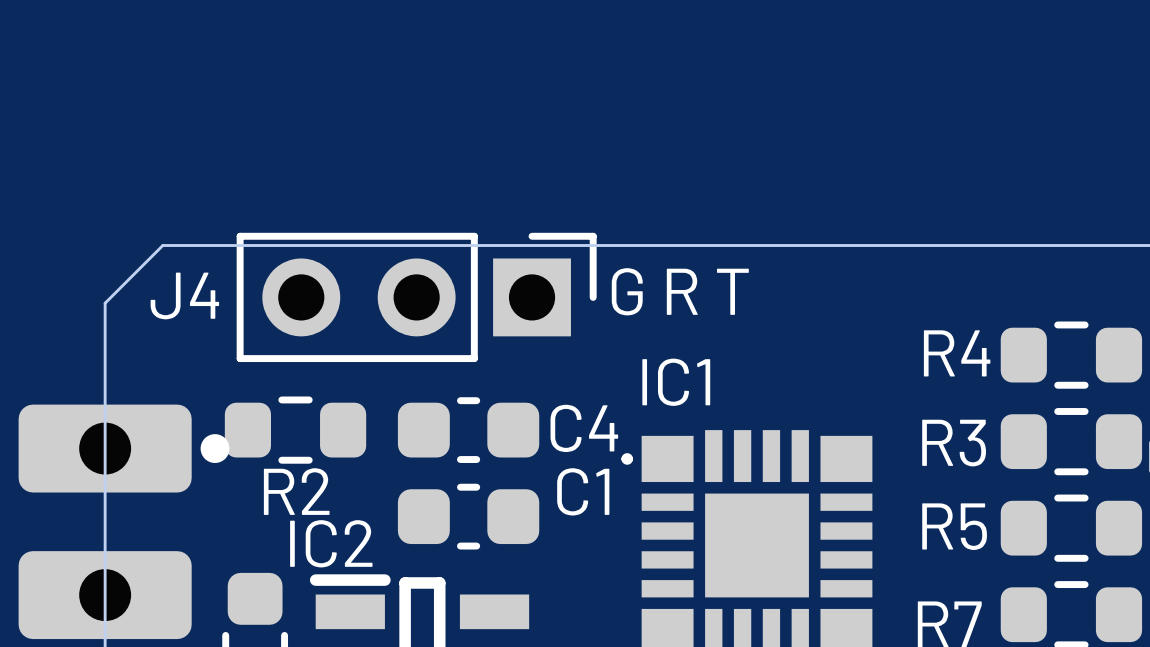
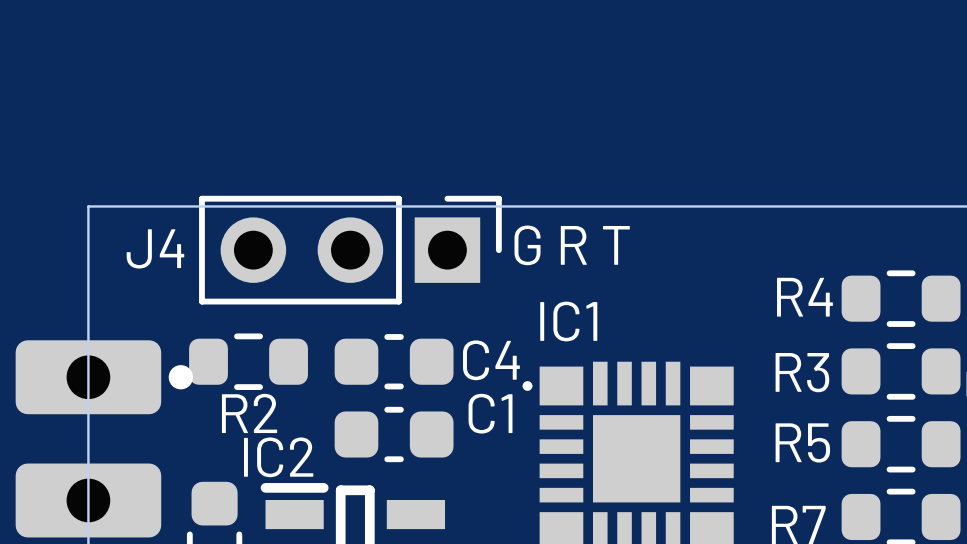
board edge: (162, 245) (105, 303) -> (136, 206) (88, 206) (88, 254)

